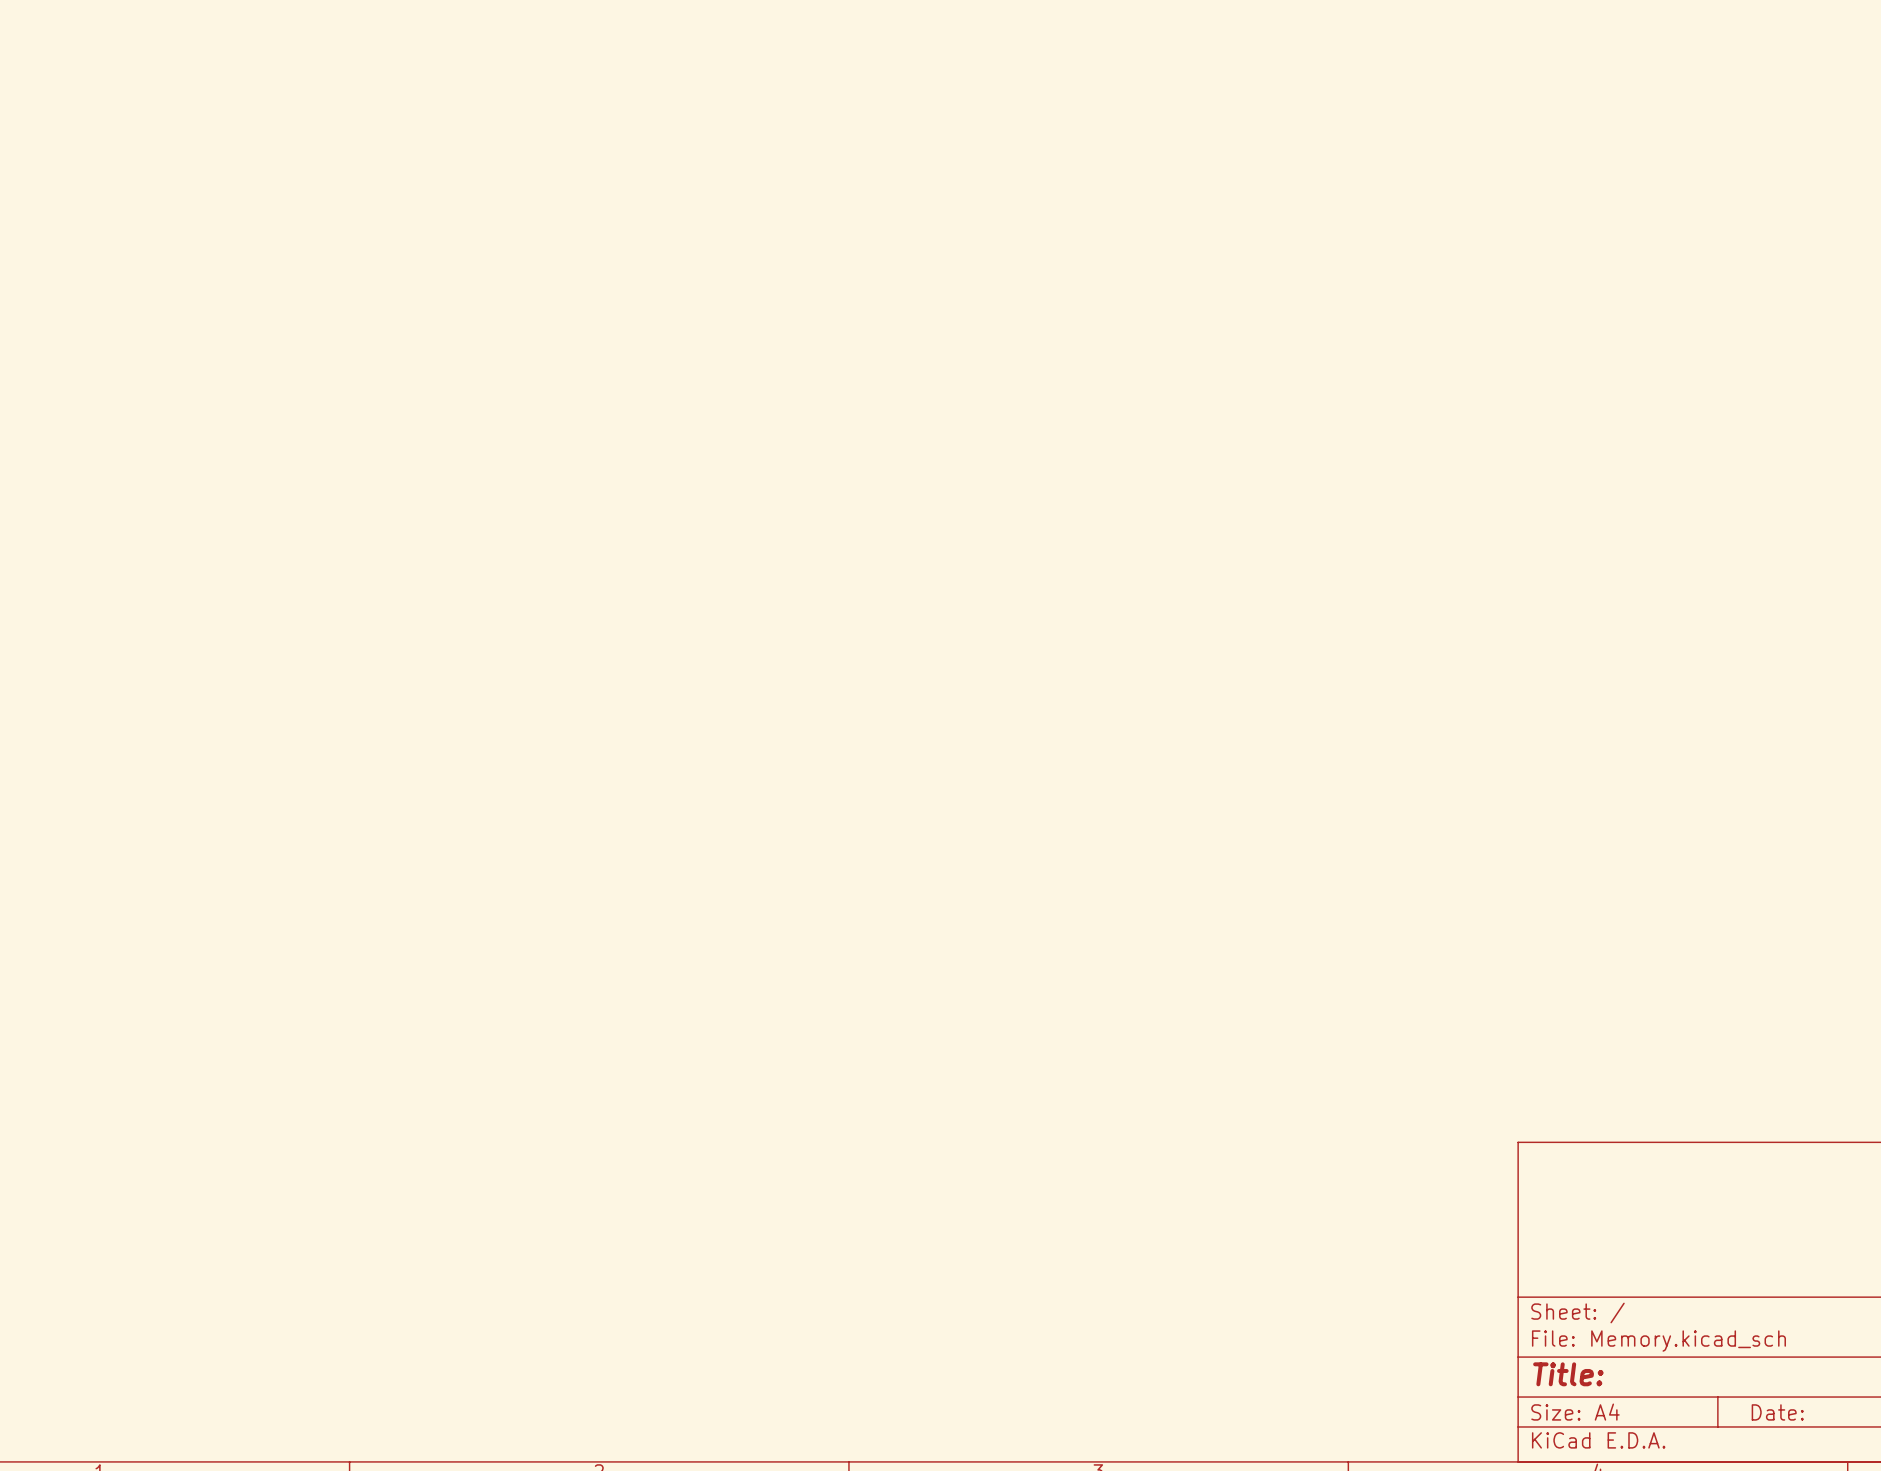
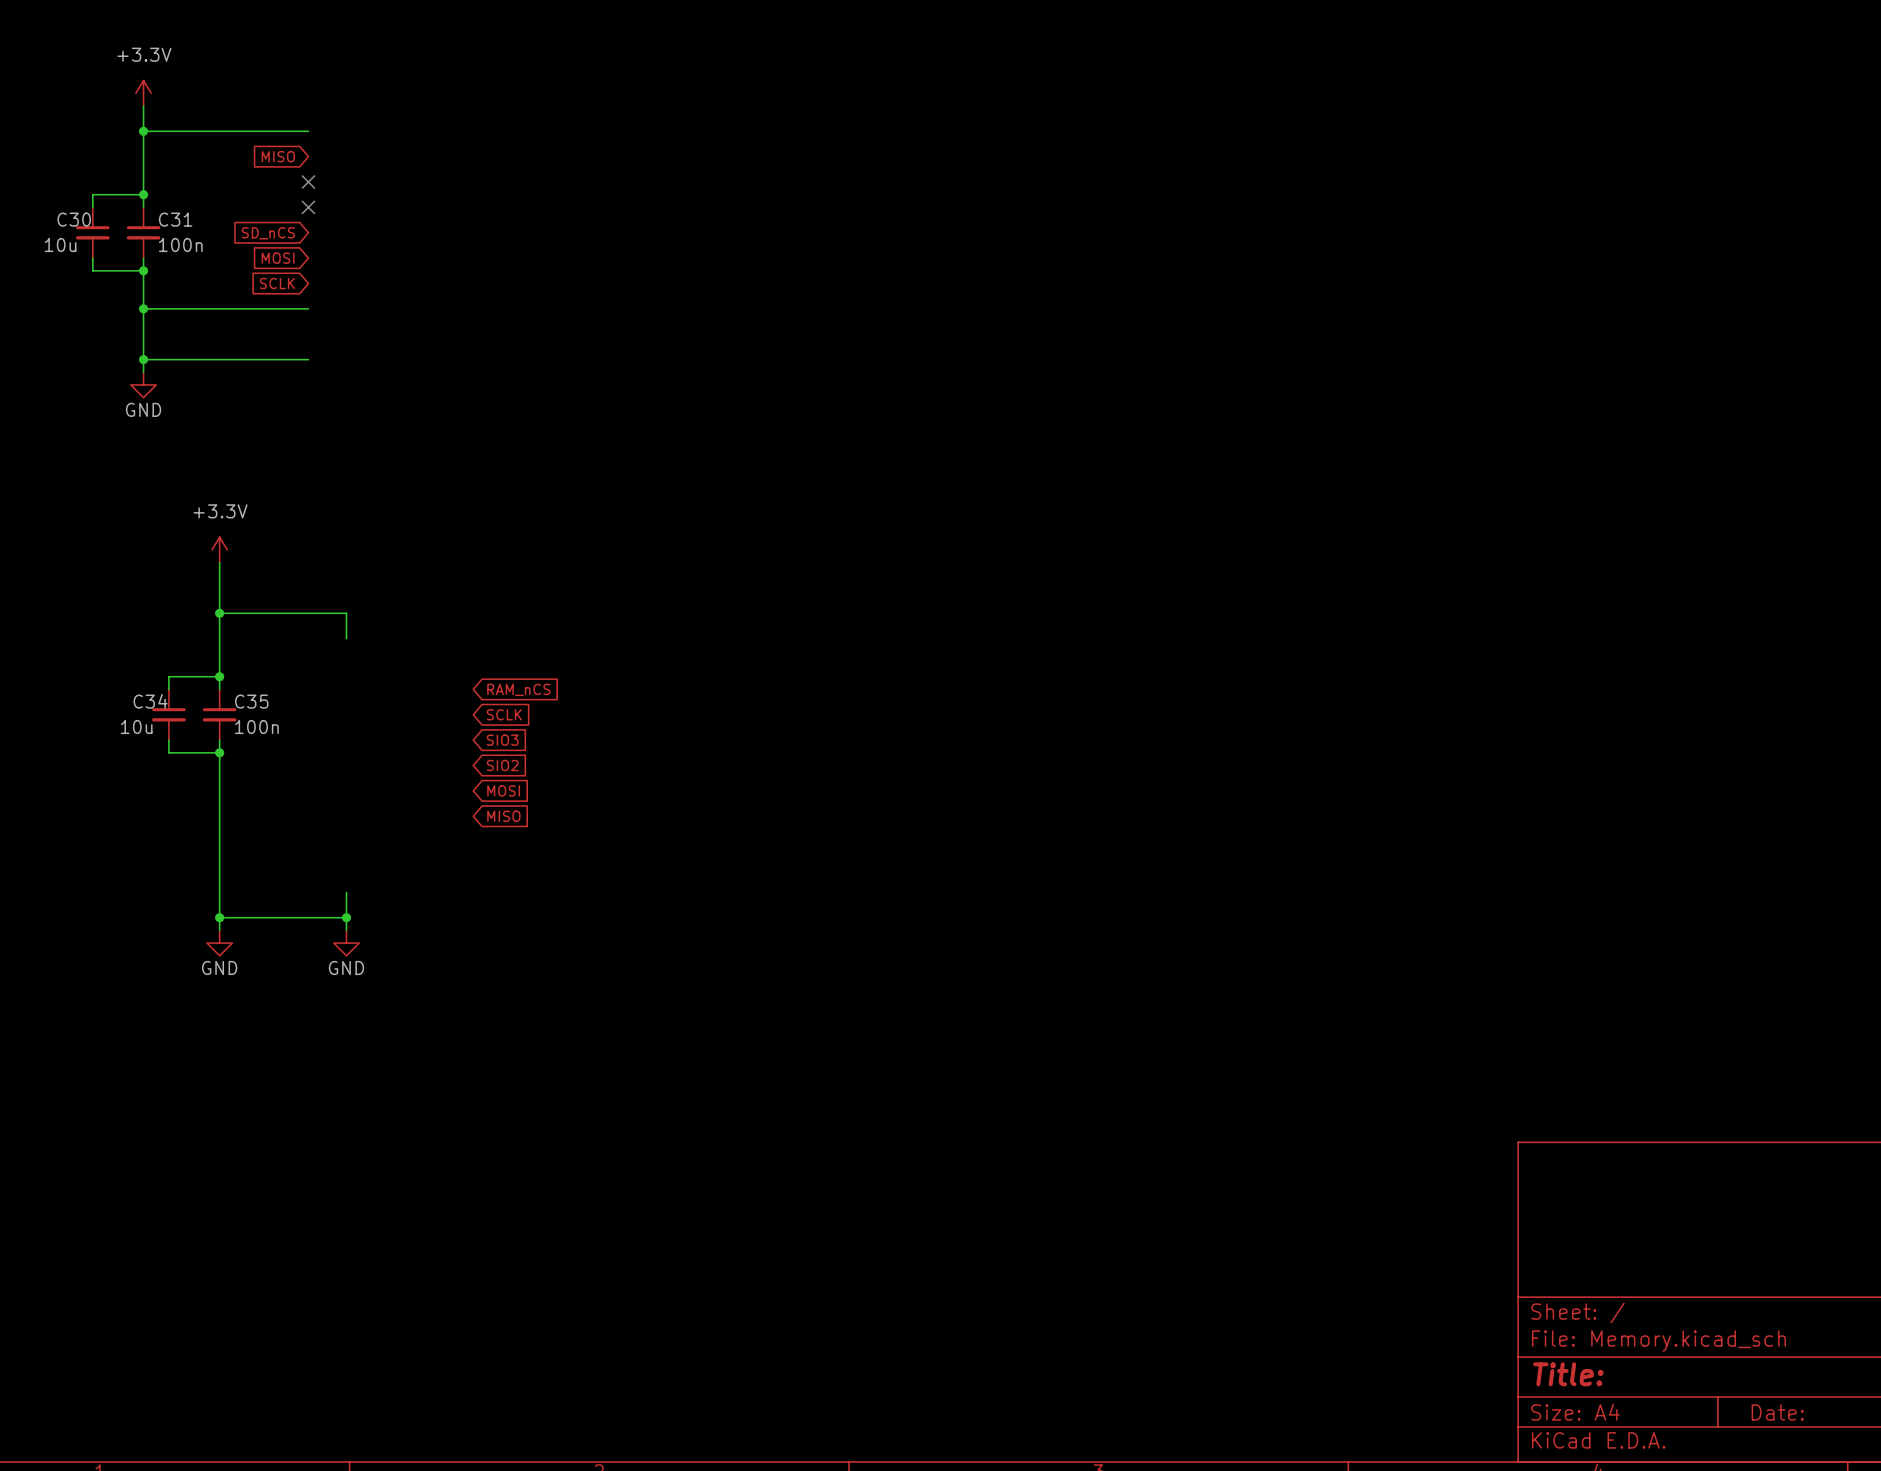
power symbol: none -> +3.3V (143, 93)
wire: none -> (143, 105) (143, 207)
wire: none -> (143, 131) (308, 131)
junction: none -> (143, 131)
global label: none -> MISO (278, 156)
no-connect mark: none -> (308, 182)
wire: none -> (143, 194) (92, 194) (92, 207)
junction: none -> (143, 194)
no-connect mark: none -> (308, 207)
C30: none -> 10u (92, 232)
C31: none -> 100n (143, 232)
global label: none -> SD_nCS (268, 233)
wire: none -> (92, 258) (92, 270) (143, 270)
wire: none -> (143, 258) (143, 372)
global label: none -> MOSI (278, 258)
junction: none -> (143, 270)
global label: none -> SCLK (277, 283)
wire: none -> (143, 308) (308, 308)
junction: none -> (143, 308)
wire: none -> (143, 359) (308, 359)
junction: none -> (143, 359)
power symbol: none -> GND (143, 384)
power symbol: none -> +3.3V (219, 549)
wire: none -> (219, 562) (219, 689)
wire: none -> (219, 613) (346, 613) (346, 638)
junction: none -> (219, 613)
wire: none -> (219, 676) (168, 676) (168, 689)
junction: none -> (219, 676)
global label: none -> RAM_nCS (518, 689)
C34: none -> 10u (168, 714)
C35: none -> 100n (219, 714)
global label: none -> SCLK (504, 714)
wire: none -> (168, 740) (168, 752) (219, 752)
wire: none -> (219, 740) (219, 930)
global label: none -> SIO3 (502, 740)
junction: none -> (219, 752)
global label: none -> SIO2 (502, 765)
global label: none -> MOSI (503, 790)
global label: none -> MISO (503, 816)
wire: none -> (346, 892) (346, 930)
wire: none -> (219, 917) (346, 917)
junction: none -> (219, 917)
junction: none -> (346, 917)
power symbol: none -> GND (219, 943)
power symbol: none -> GND (346, 943)

